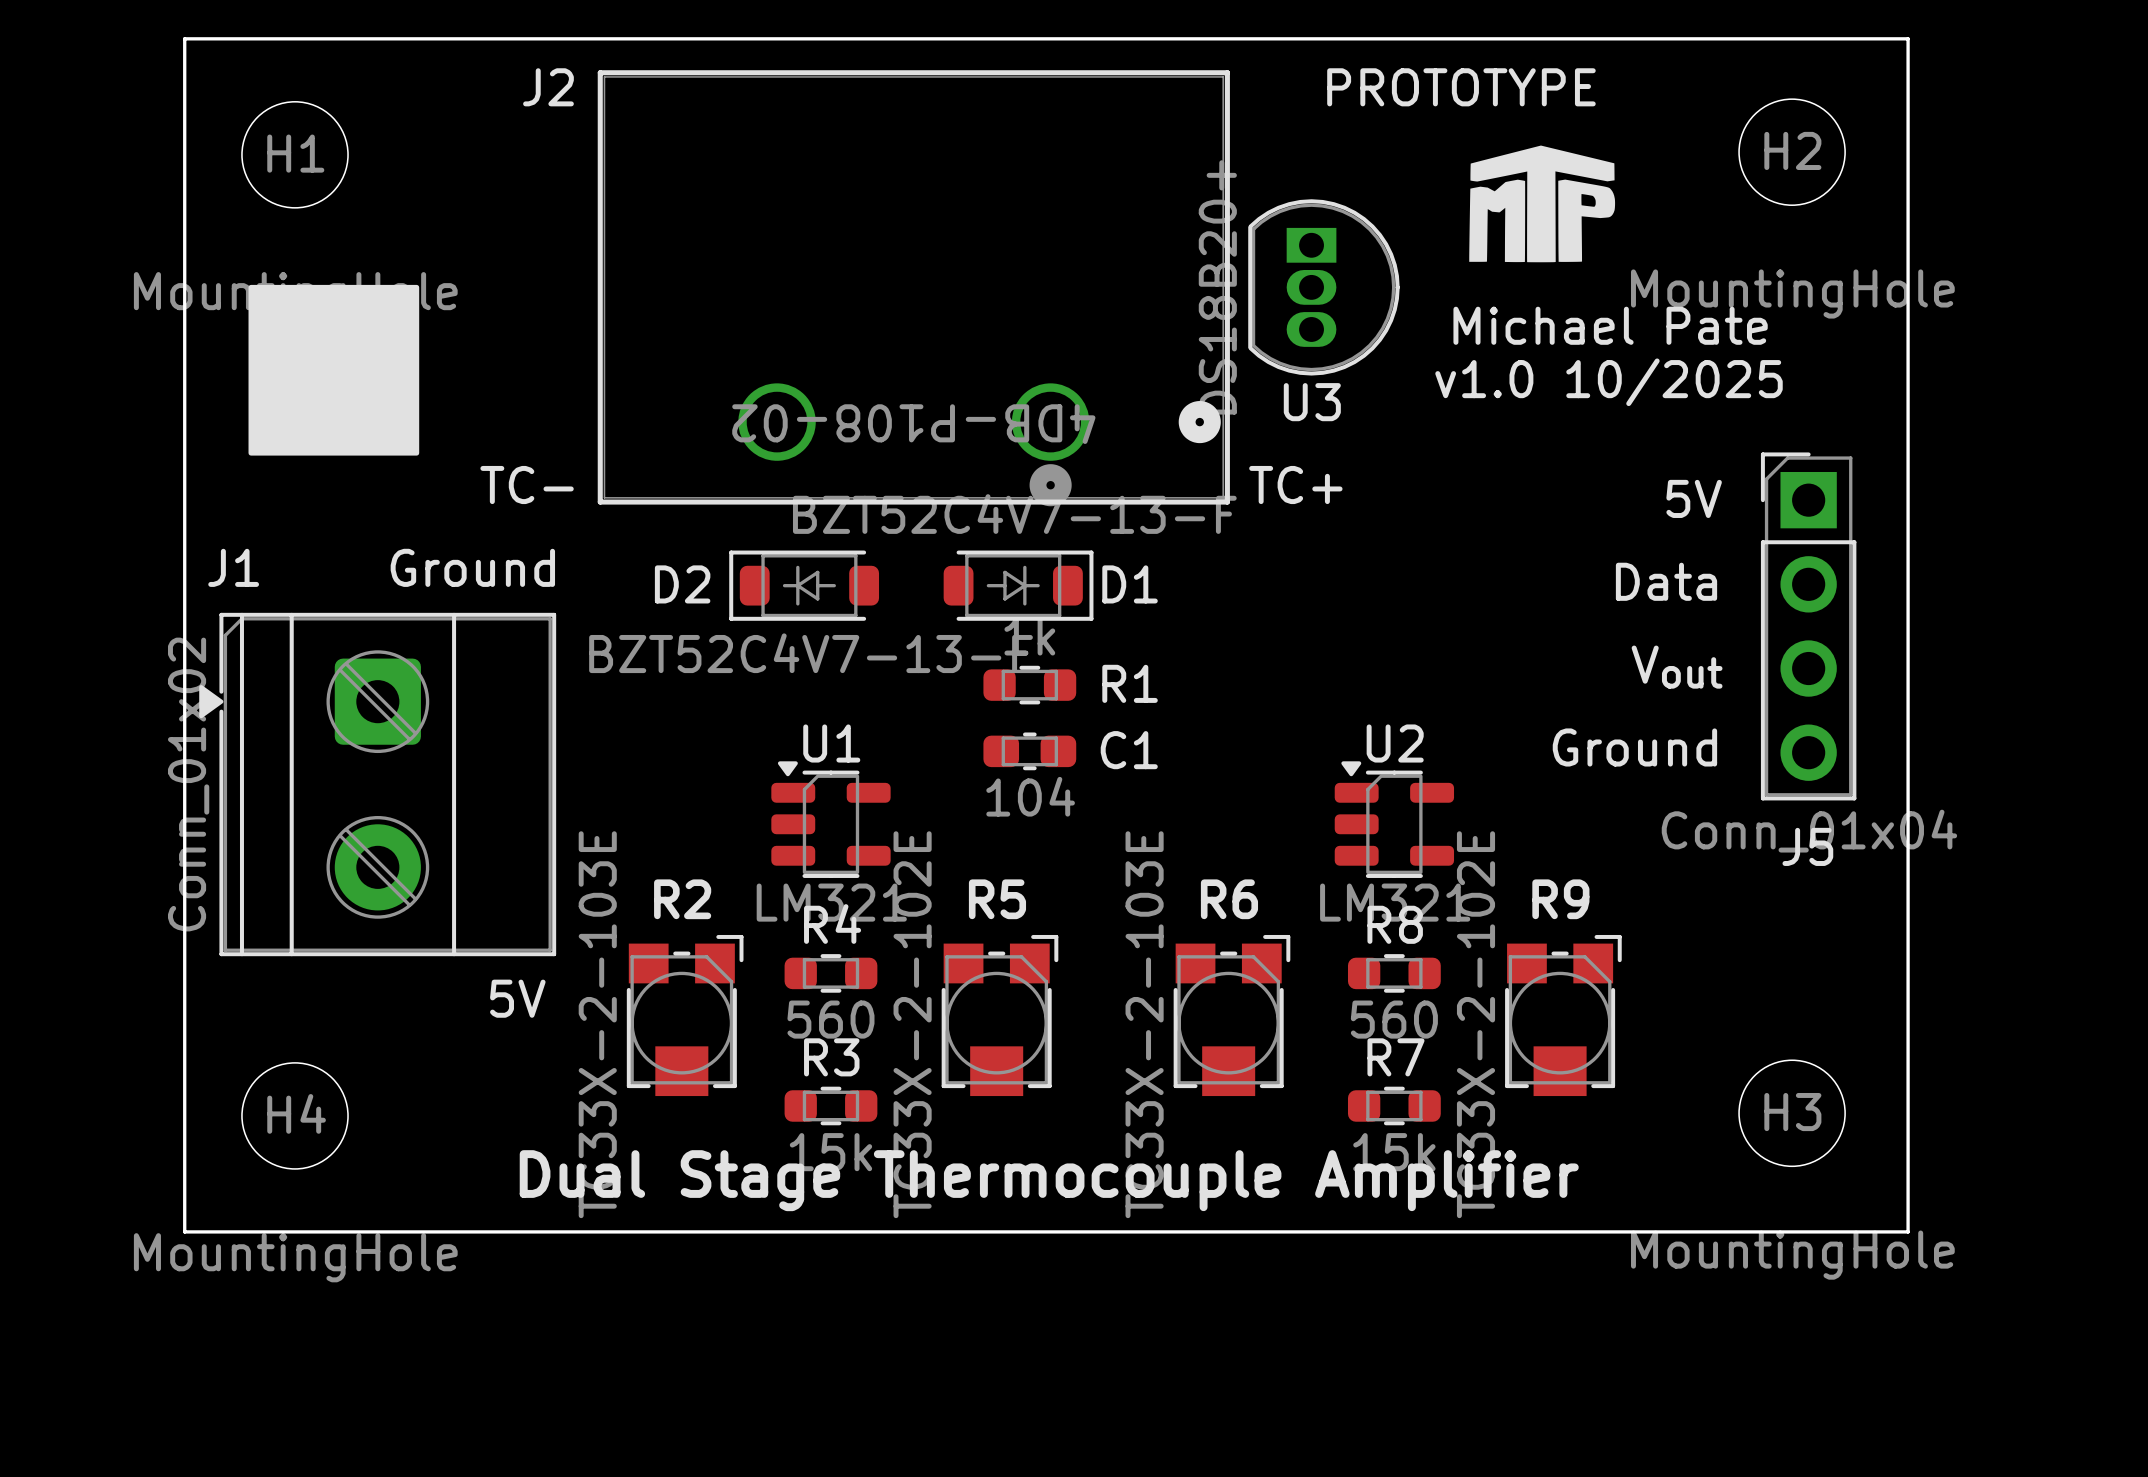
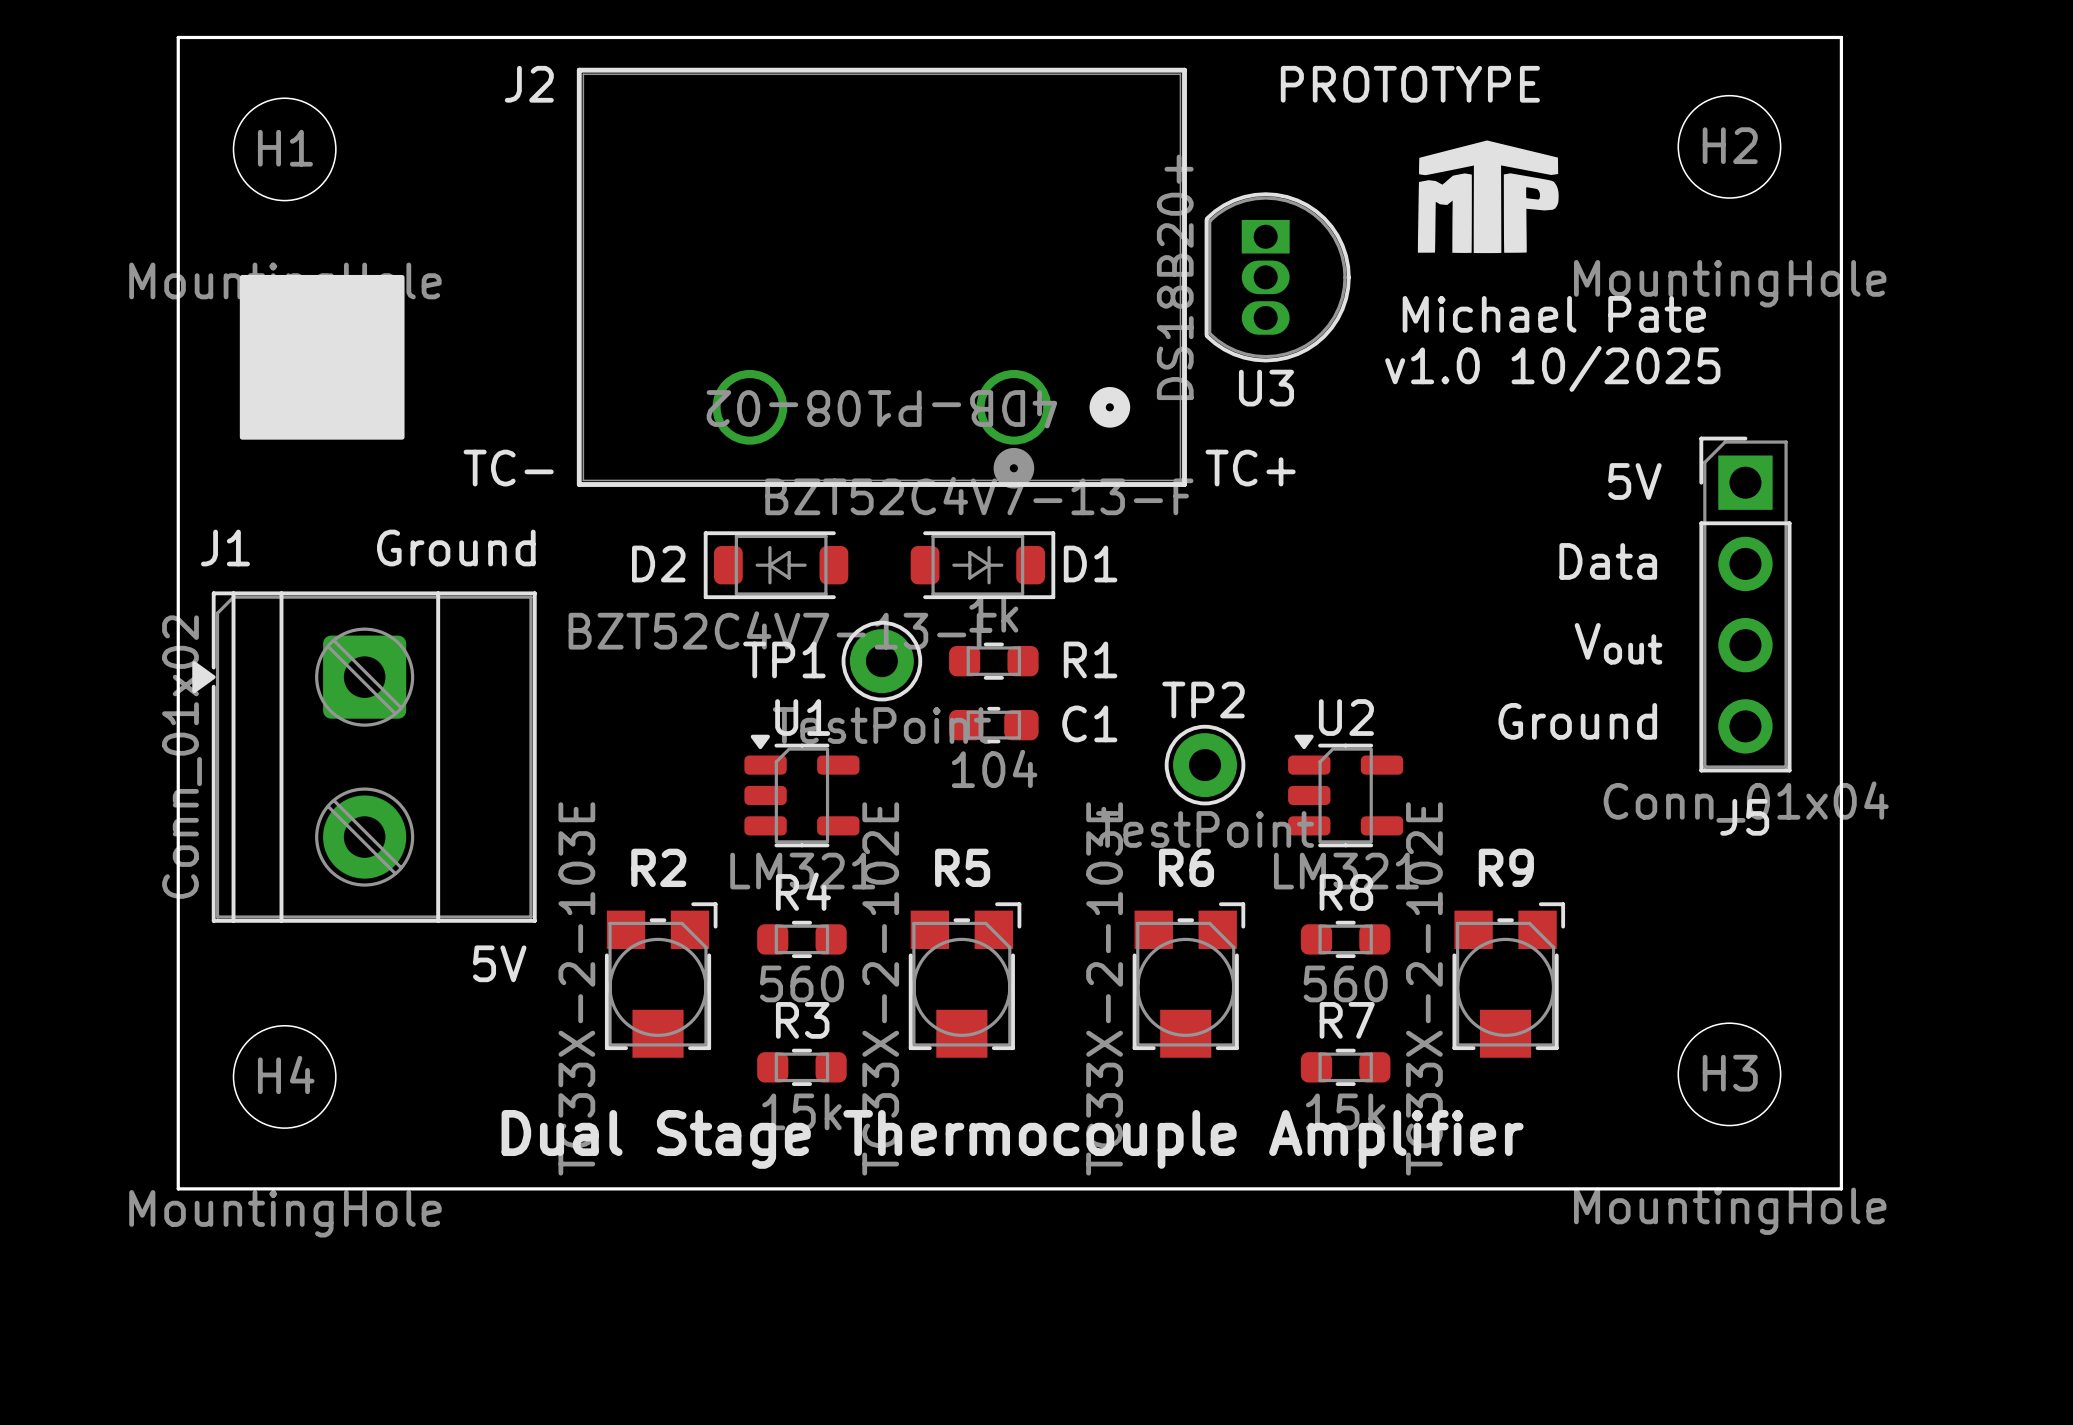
J2 footprint: [597, 70, 1230, 507] -> [576, 67, 1187, 489]
TP1: none -> TestPoint (881, 661)
TP2: none -> TestPoint (1205, 765)

